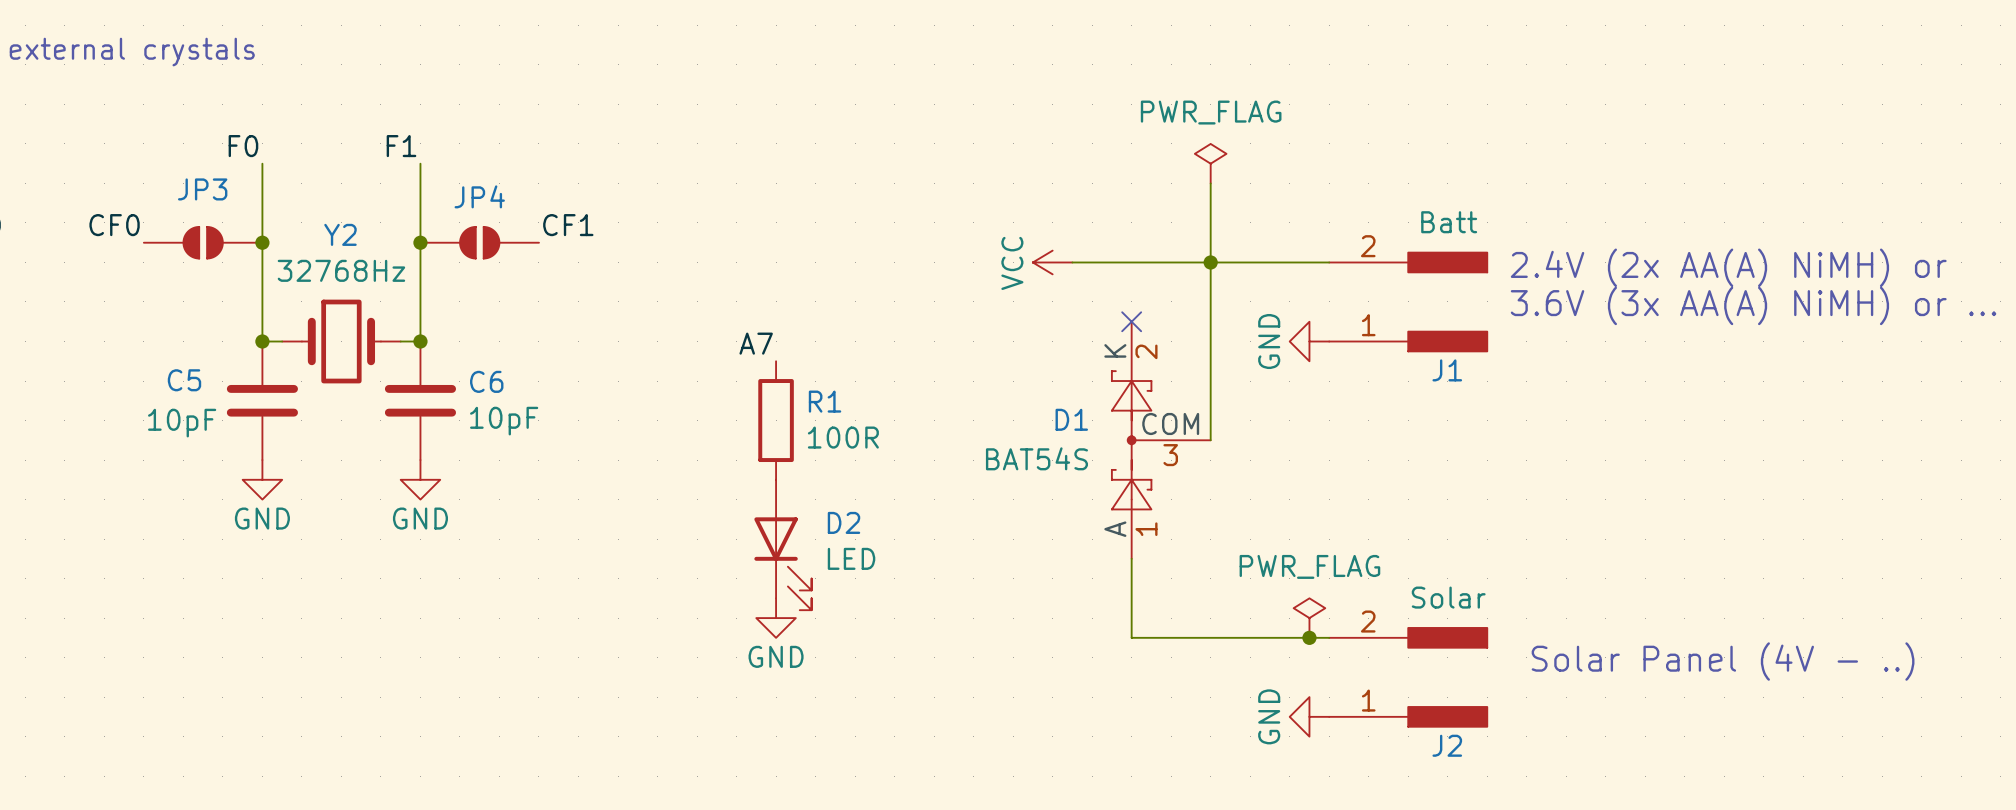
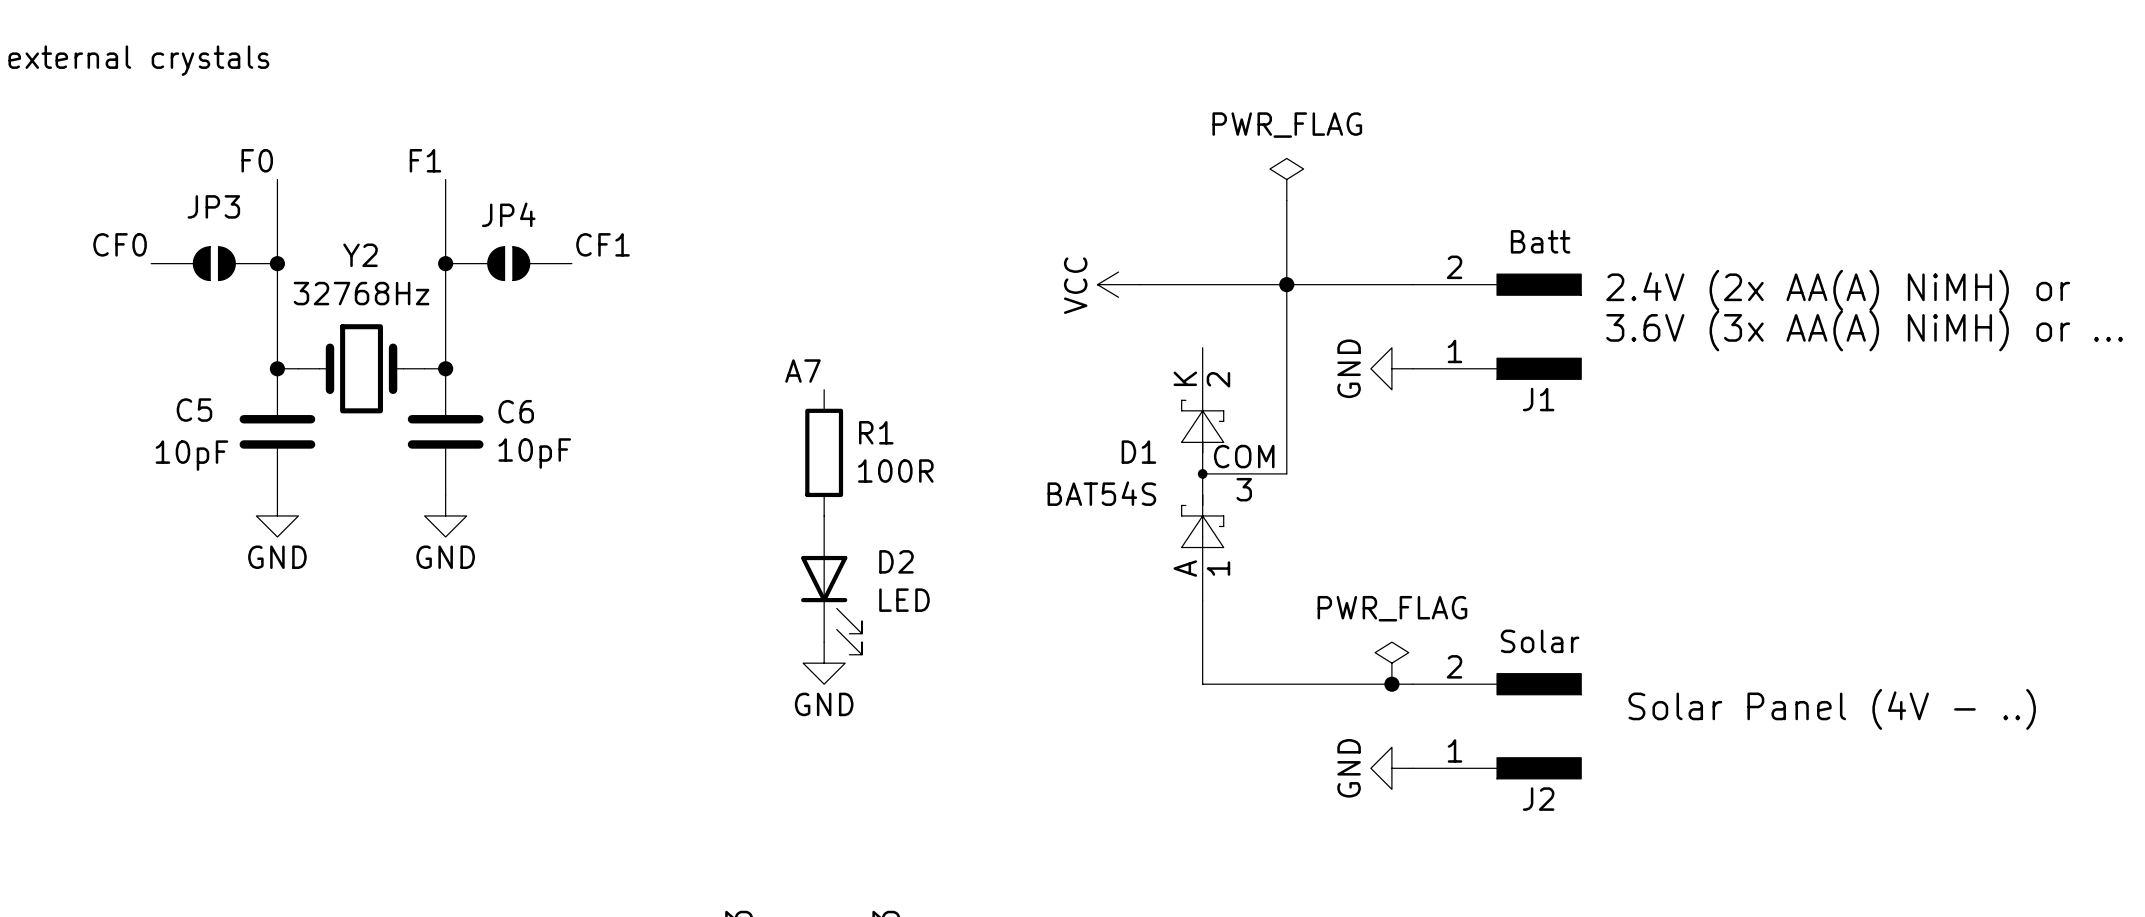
no-connect mark: (1131, 321) -> none

